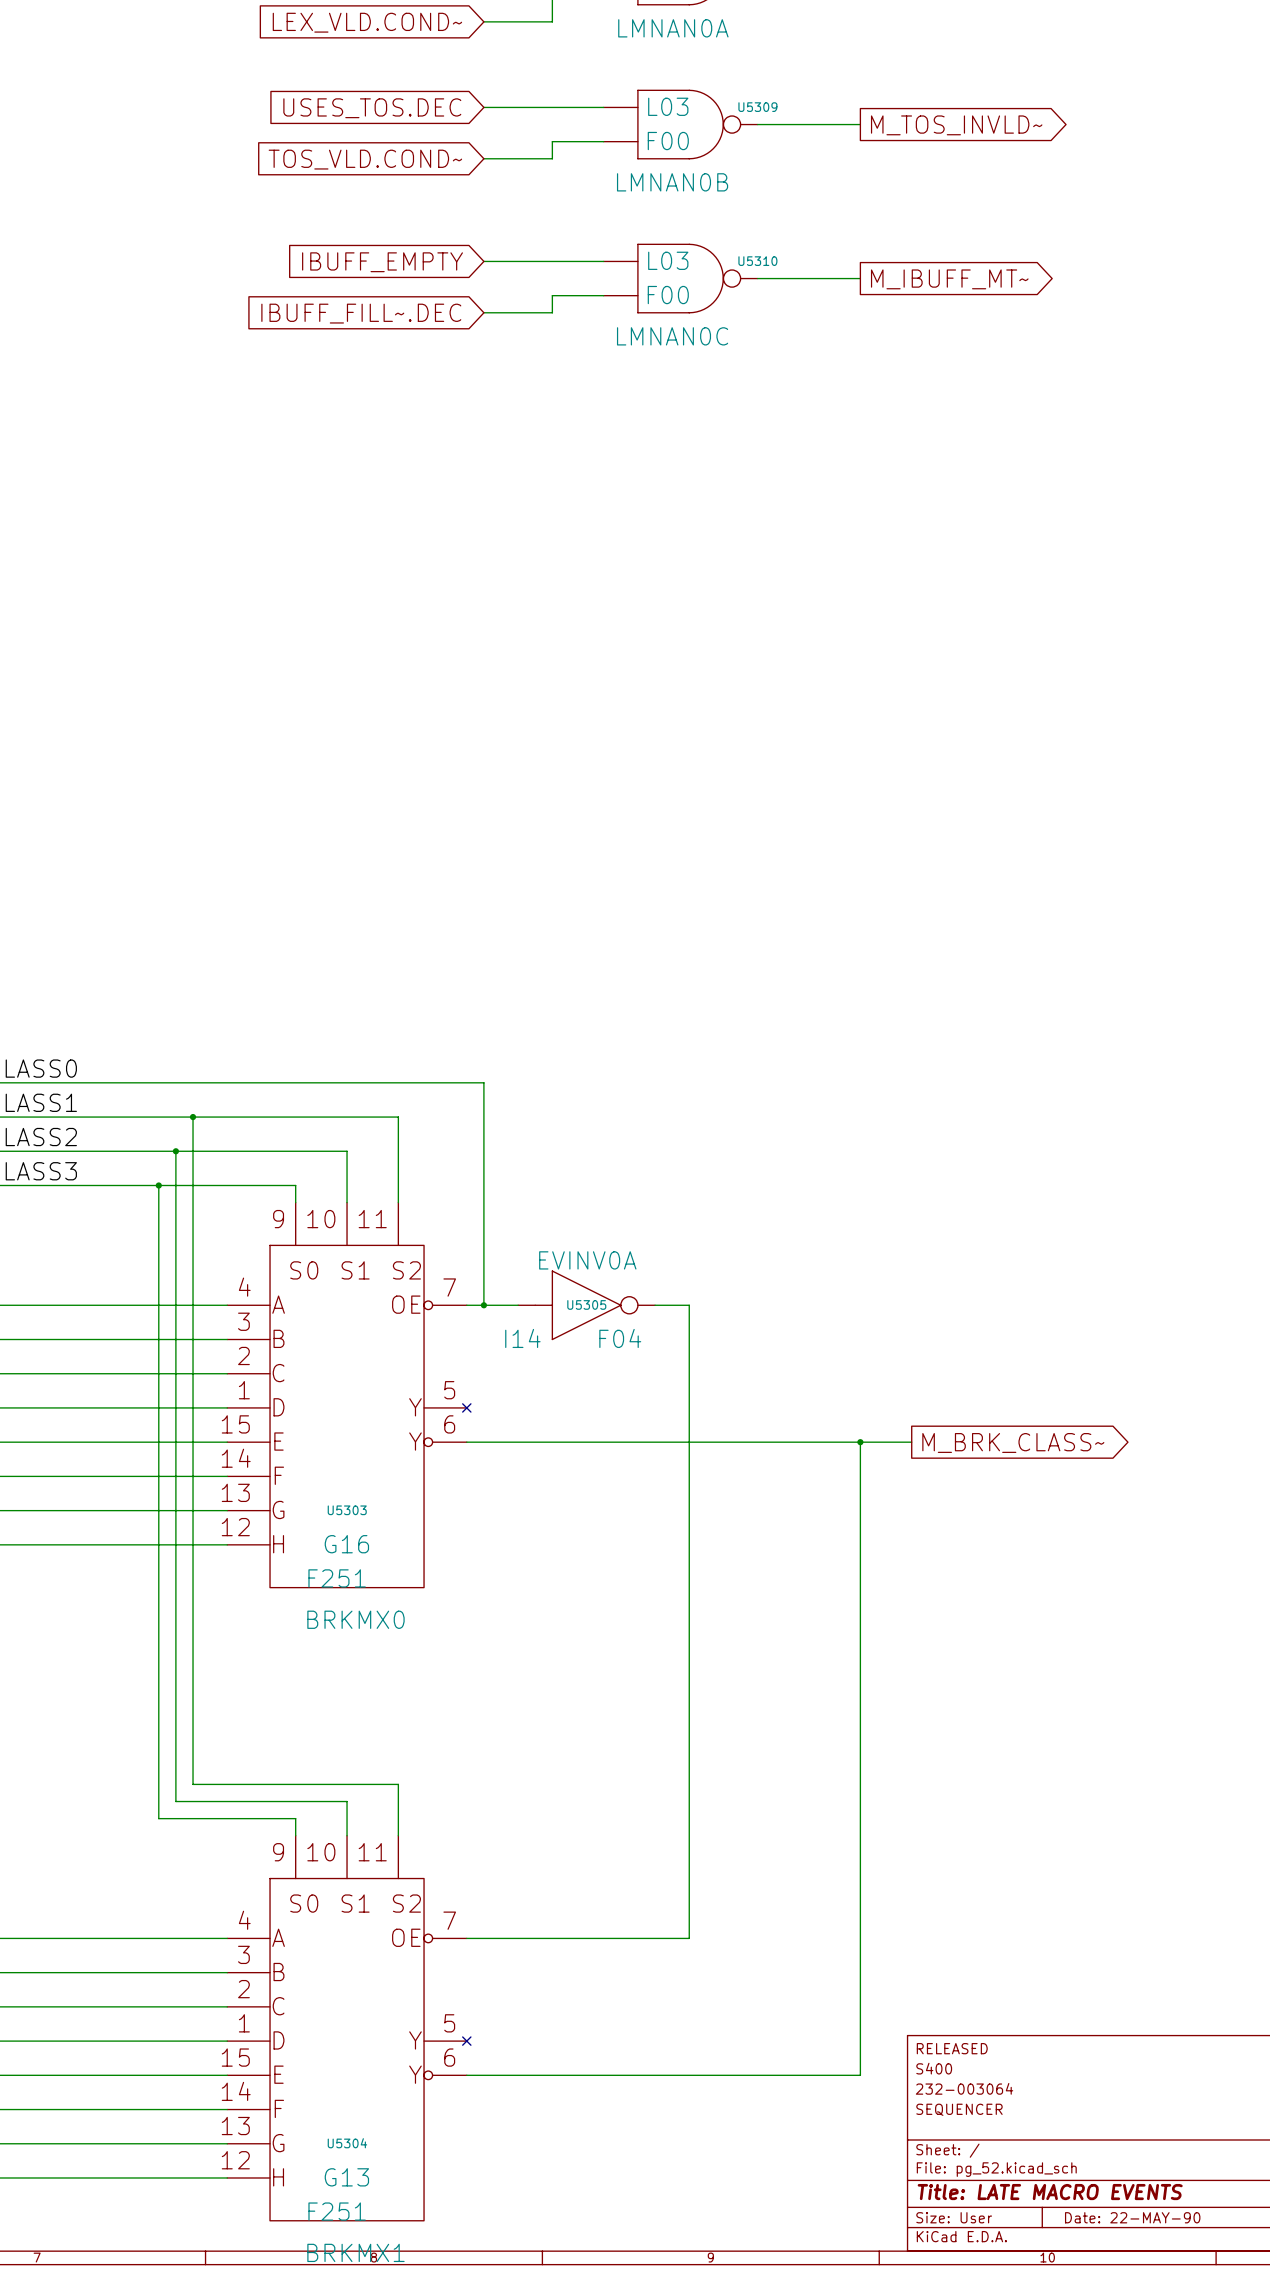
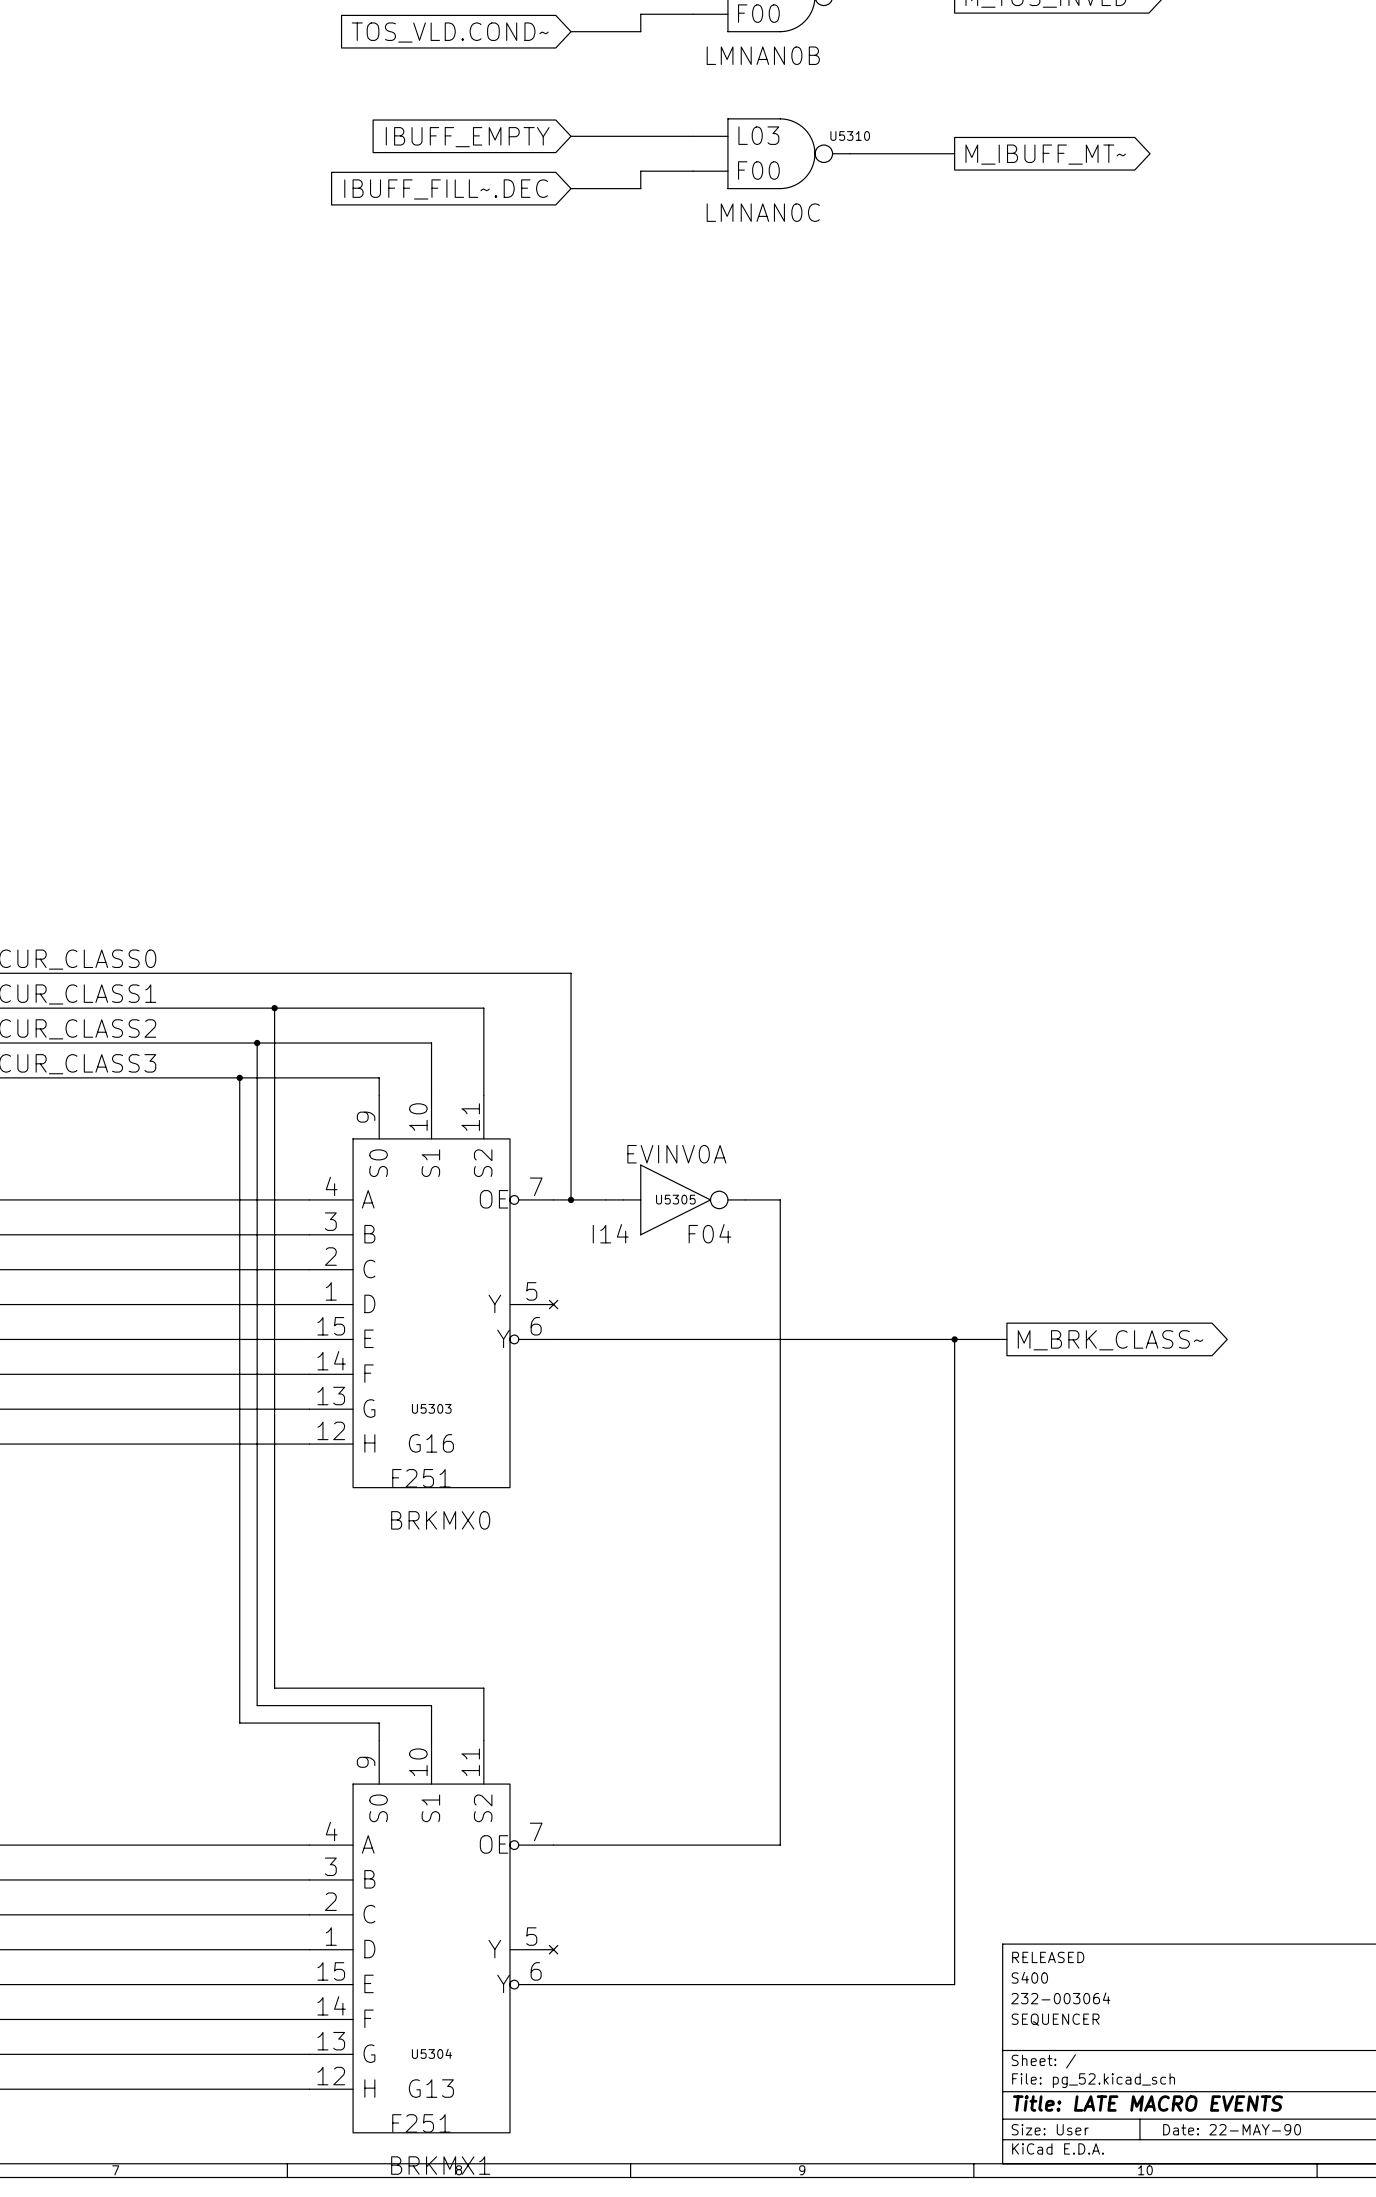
U5303 symbol: [227, 1202, 467, 1588] -> [309, 1095, 554, 1488]
U5304 symbol: [227, 1835, 467, 2221] -> [309, 1740, 554, 2133]

